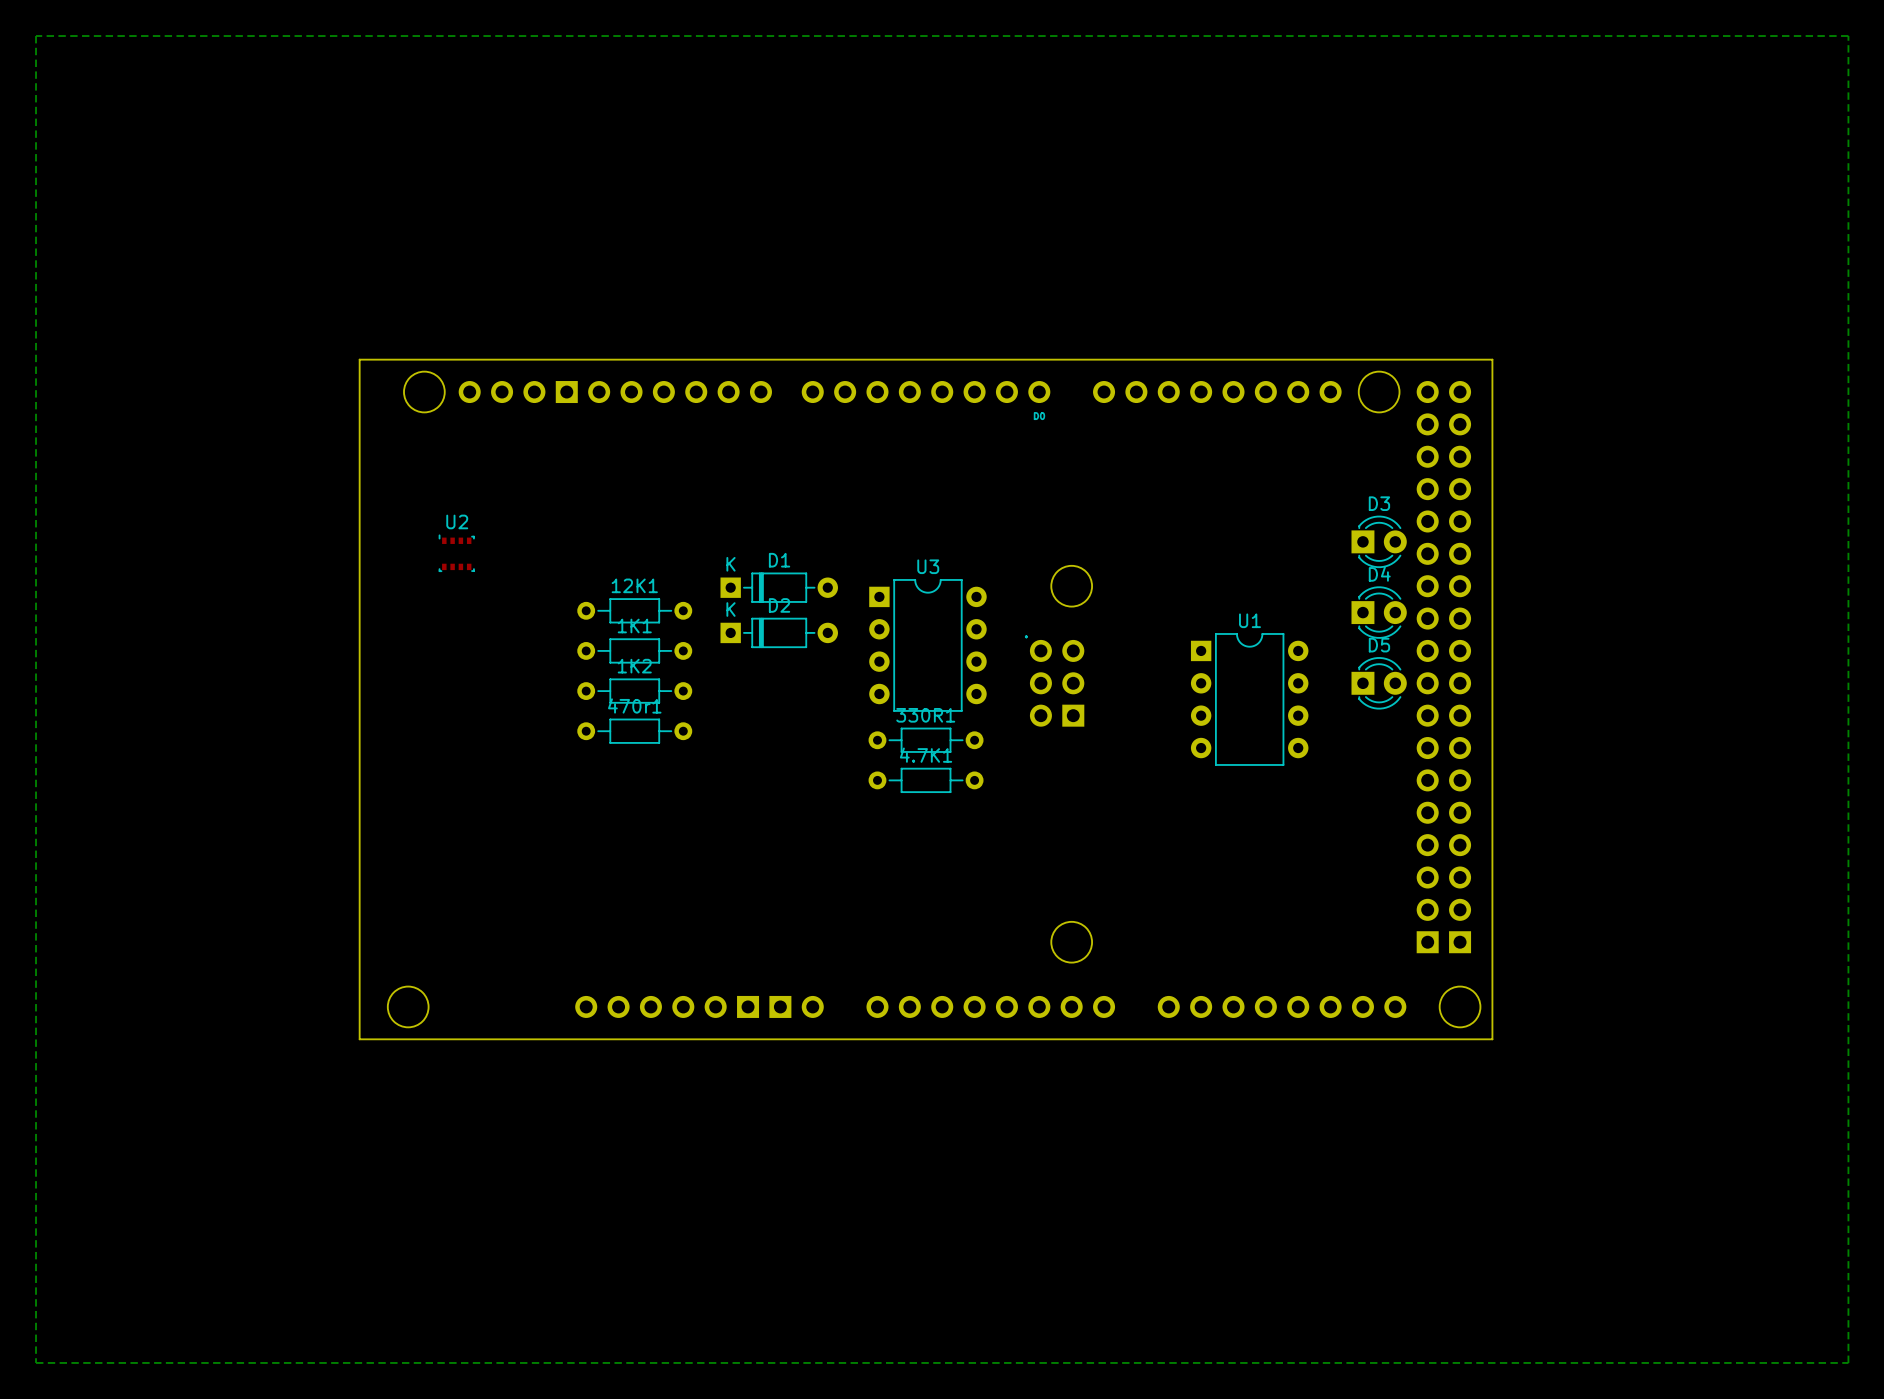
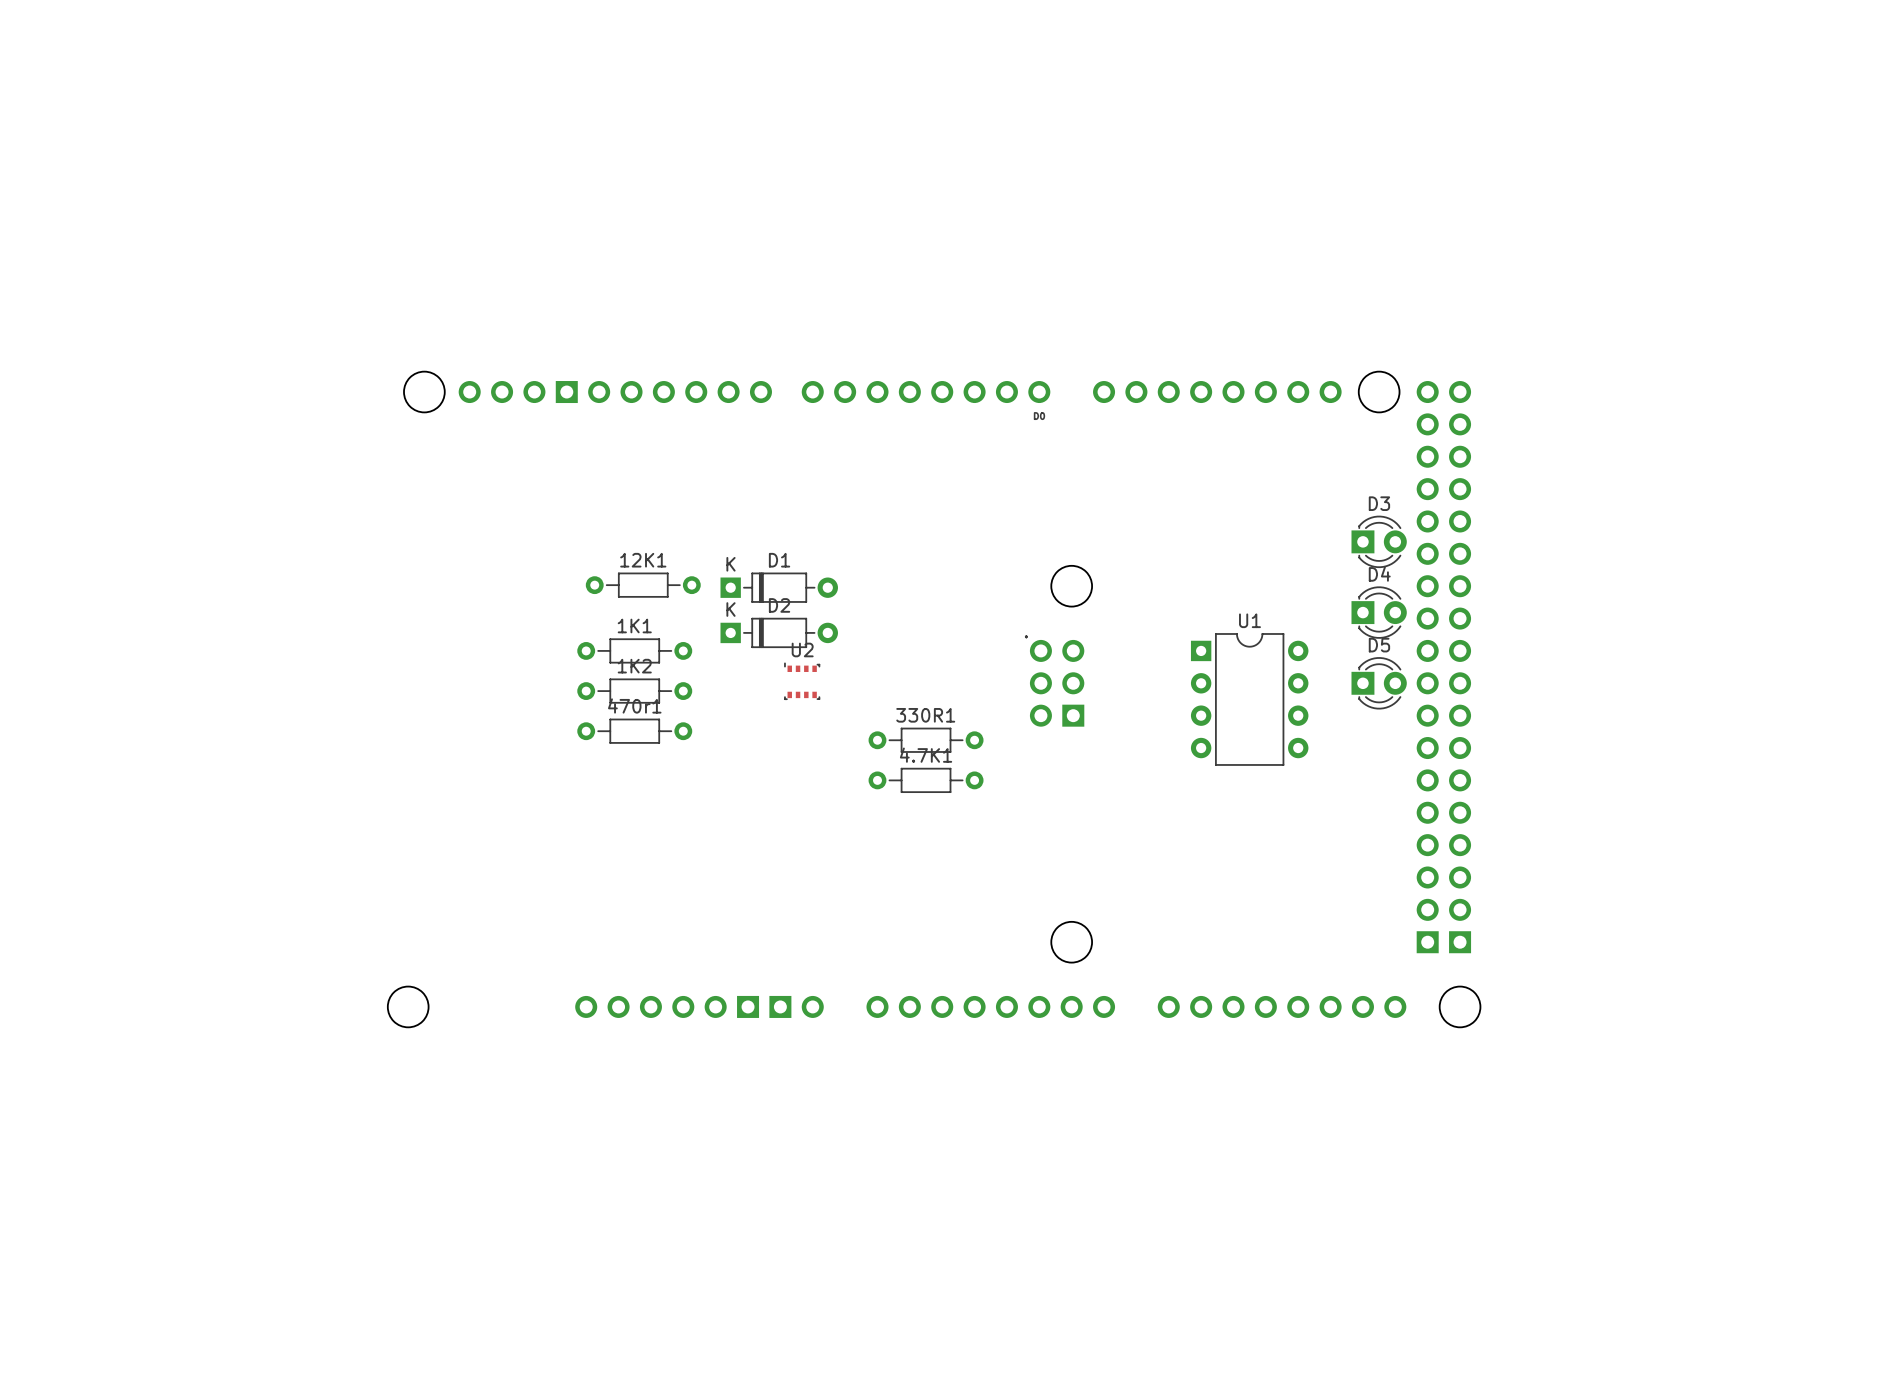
bottom zone outline: (36, 36) (36, 1362) (1848, 1362) (1848, 36) (36, 36) -> none
board edge: (359, 359) (359, 1039) (1492, 1039) (1492, 359) (359, 359) -> none
U2 position: (456, 553) -> (802, 681)
12K1 position: (634, 610) -> (643, 585)
U3: (927, 645) -> none

